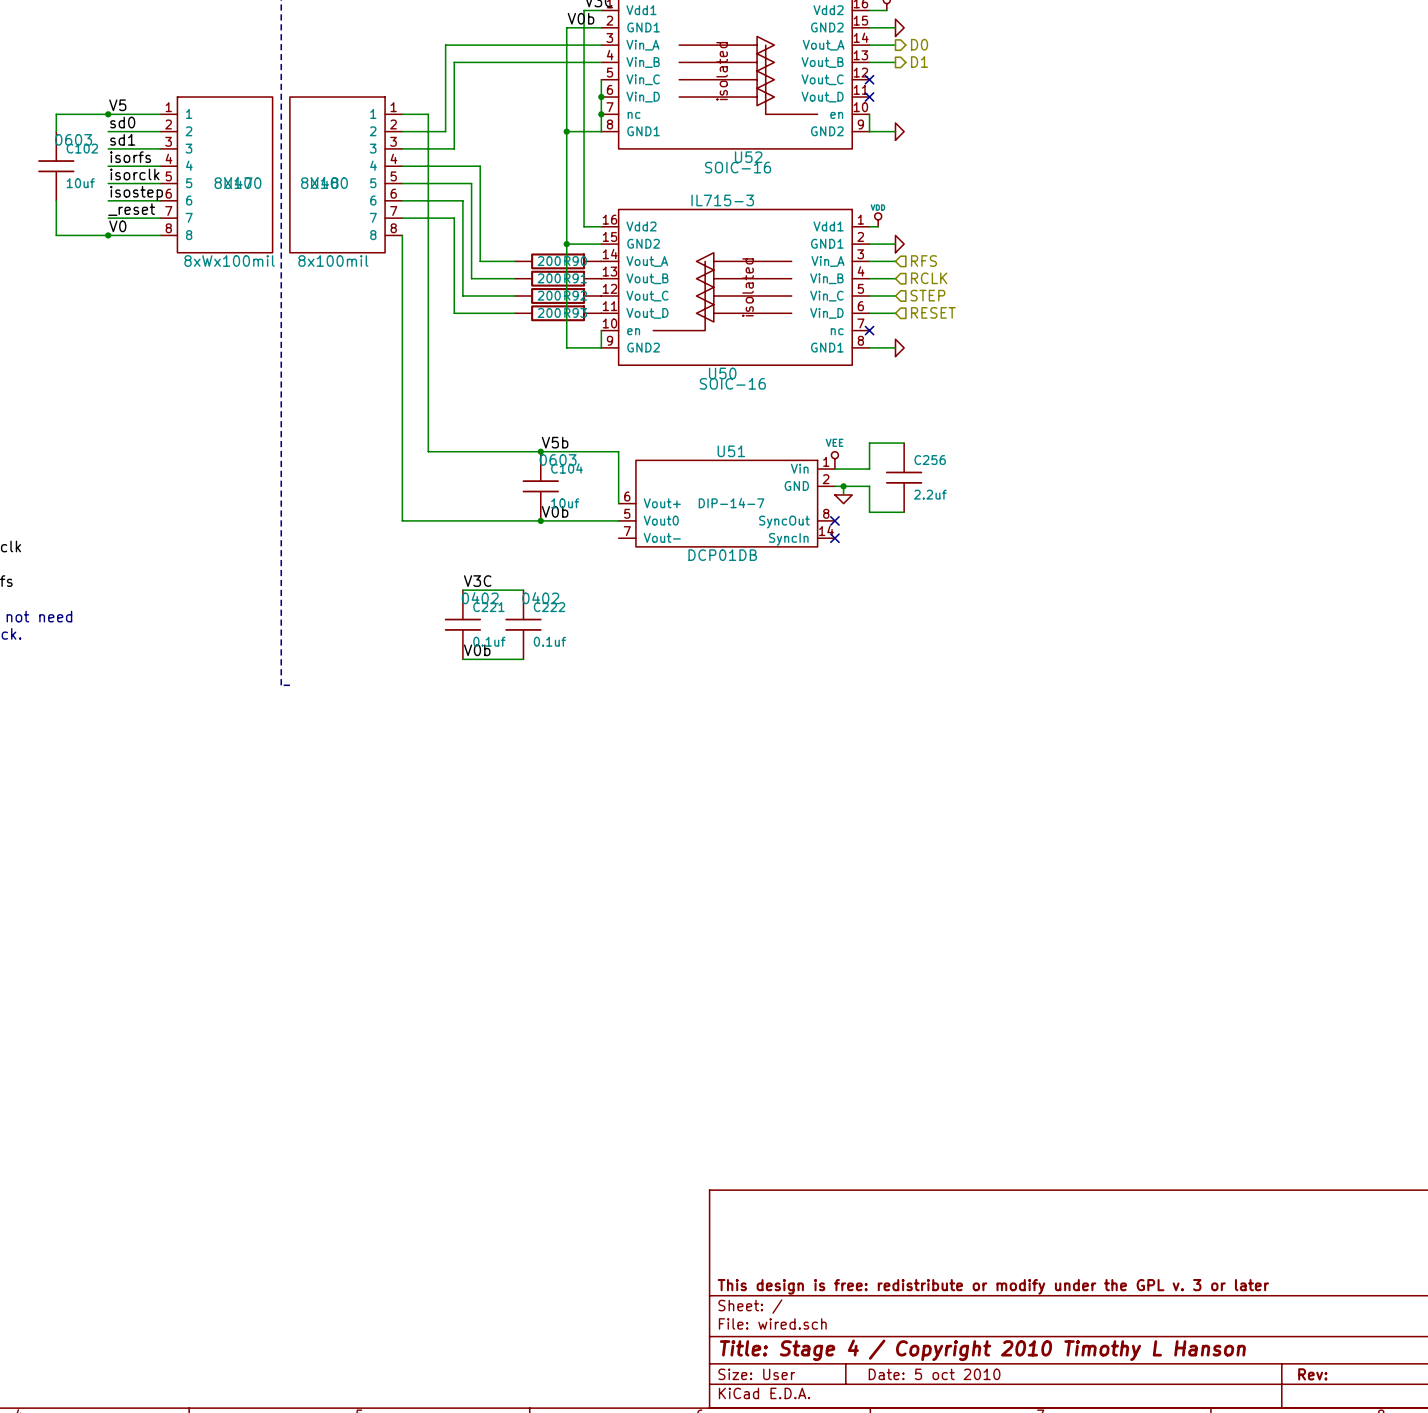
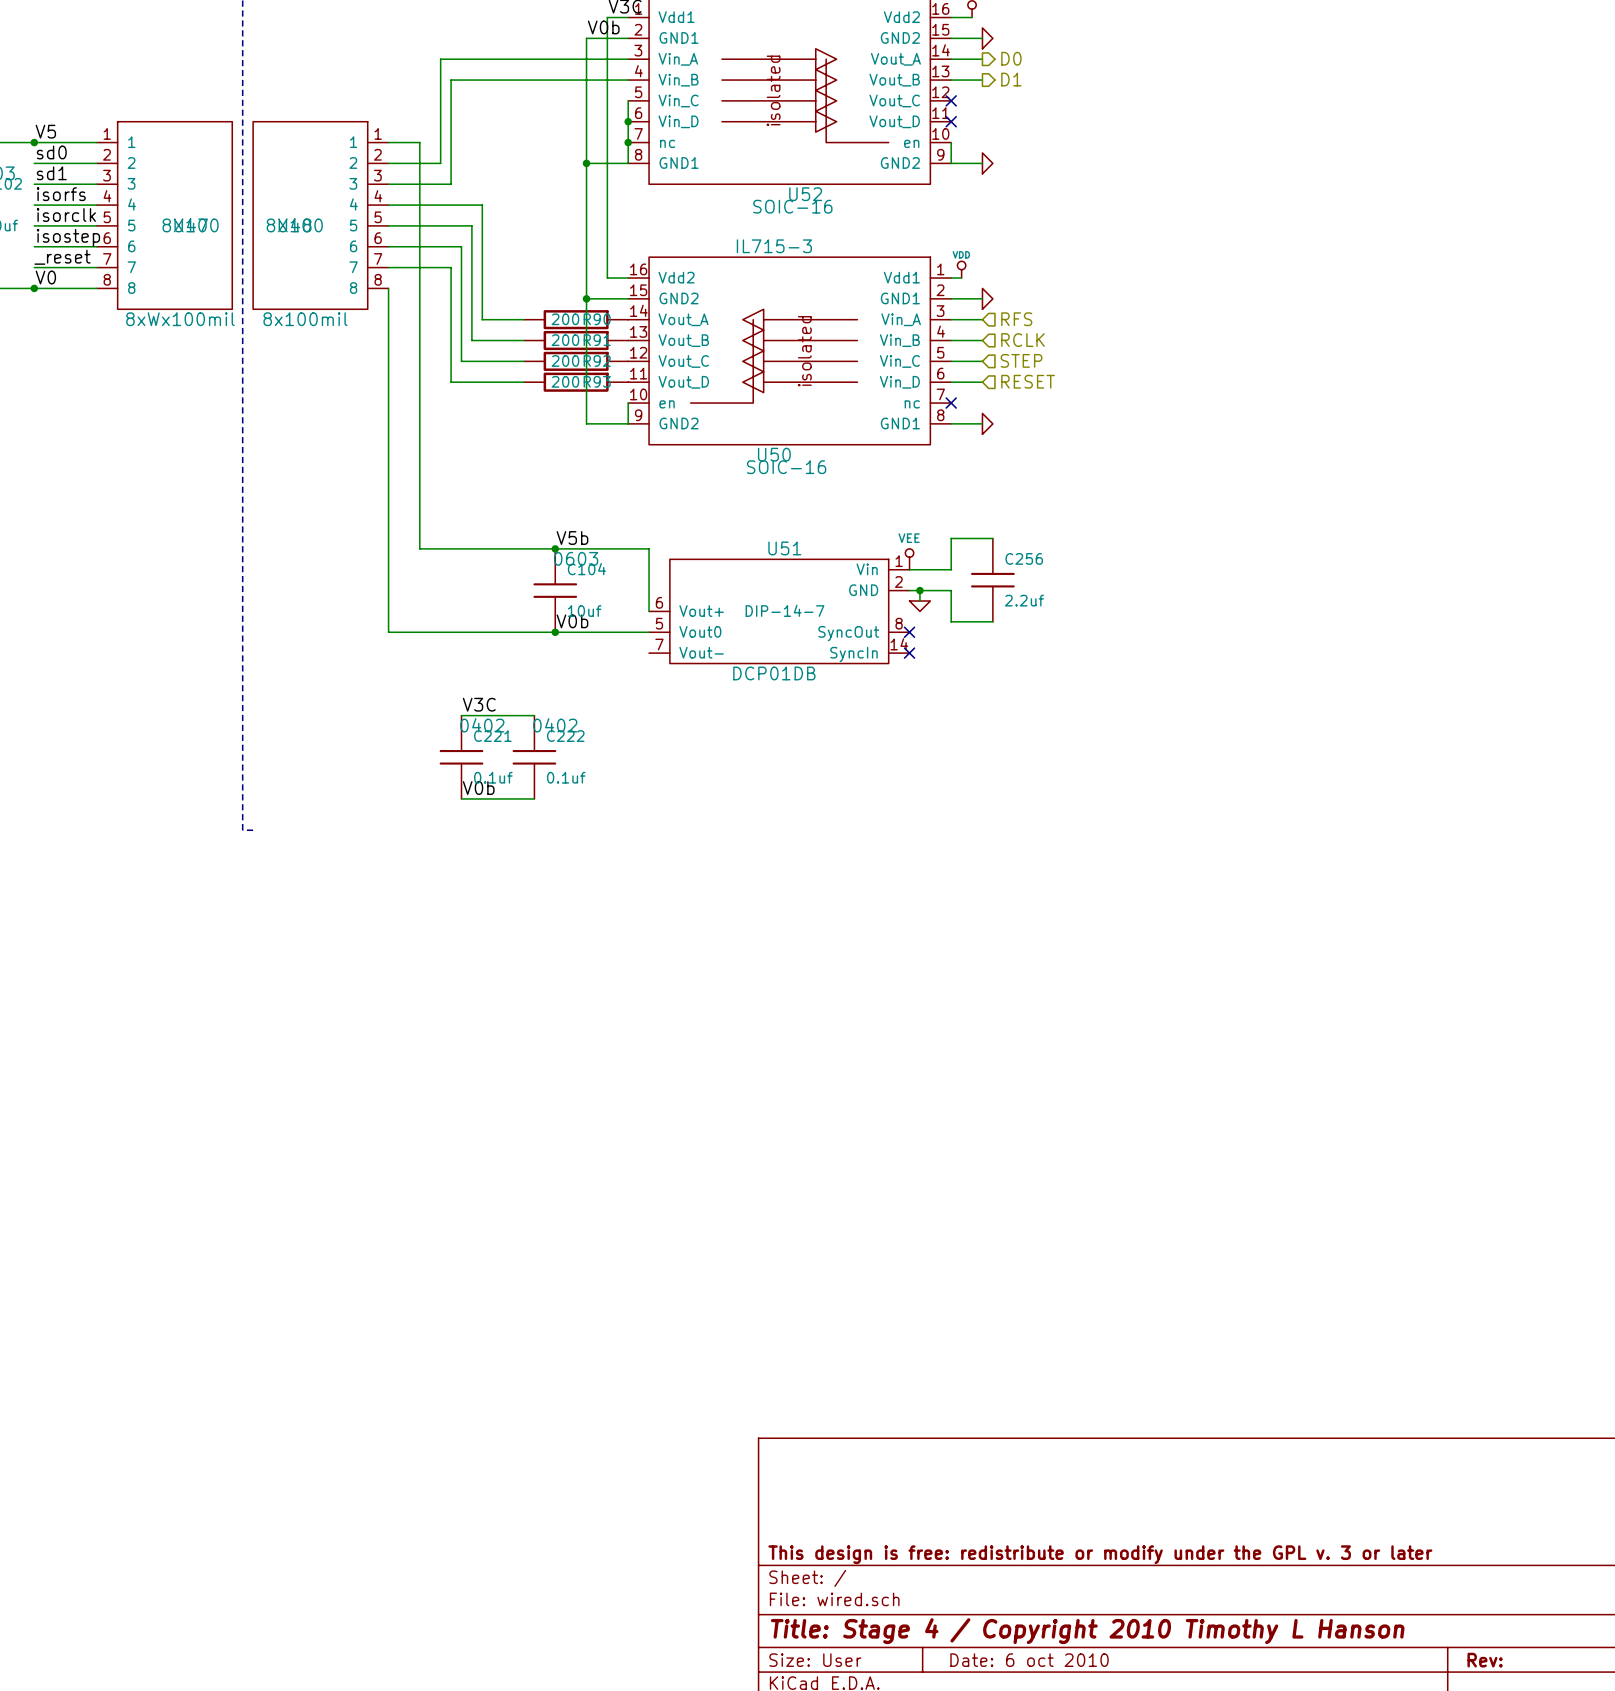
title block: Date: 5 oct 2010 (934, 1374) -> Date: 6 oct 2010 (1029, 1660)

